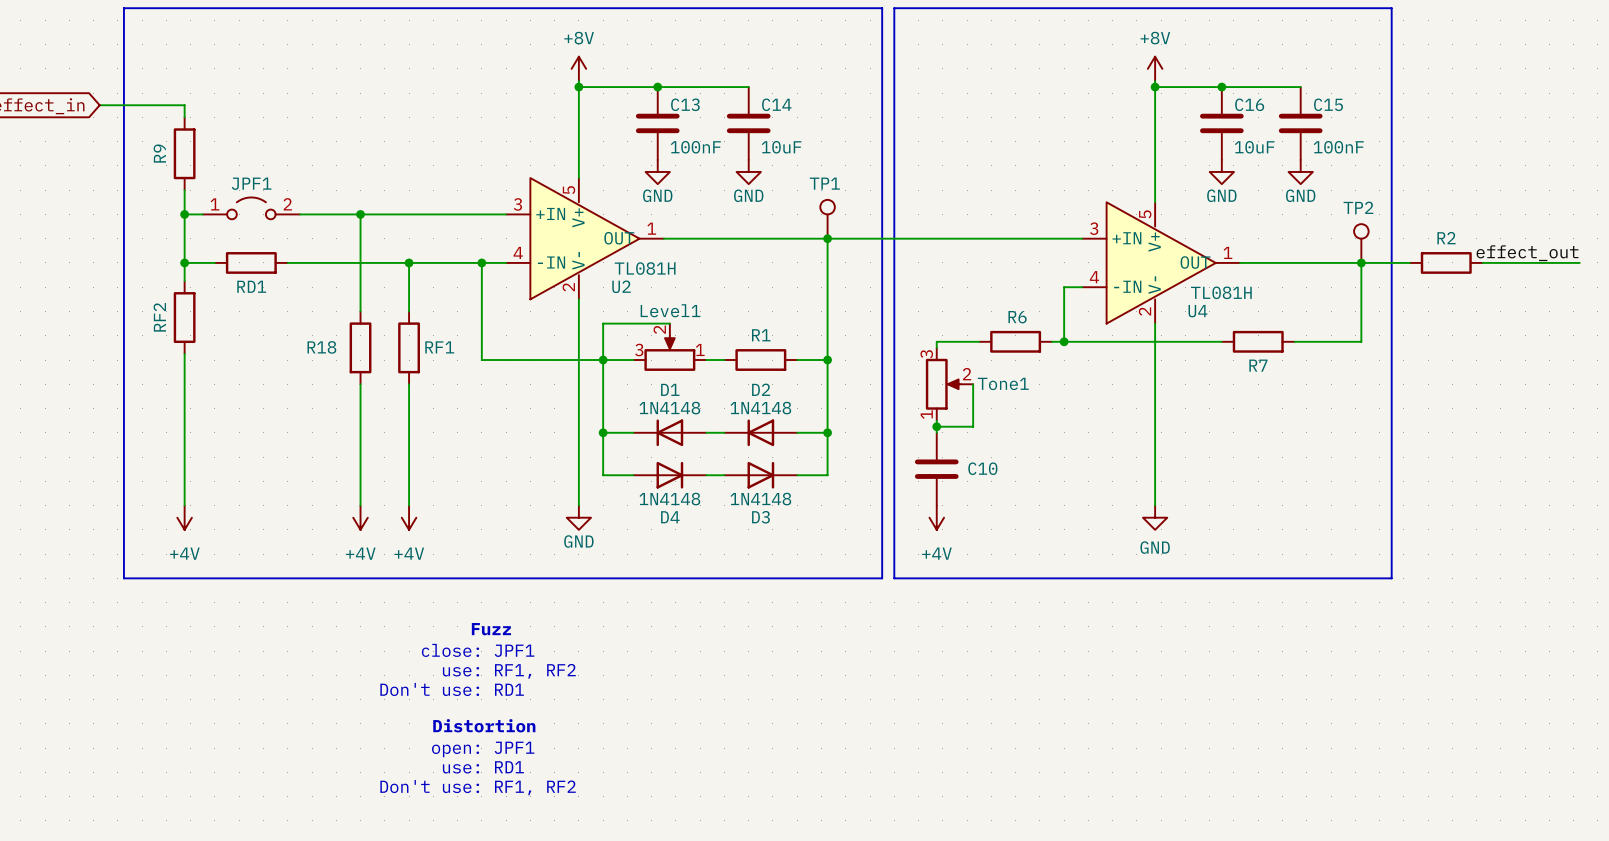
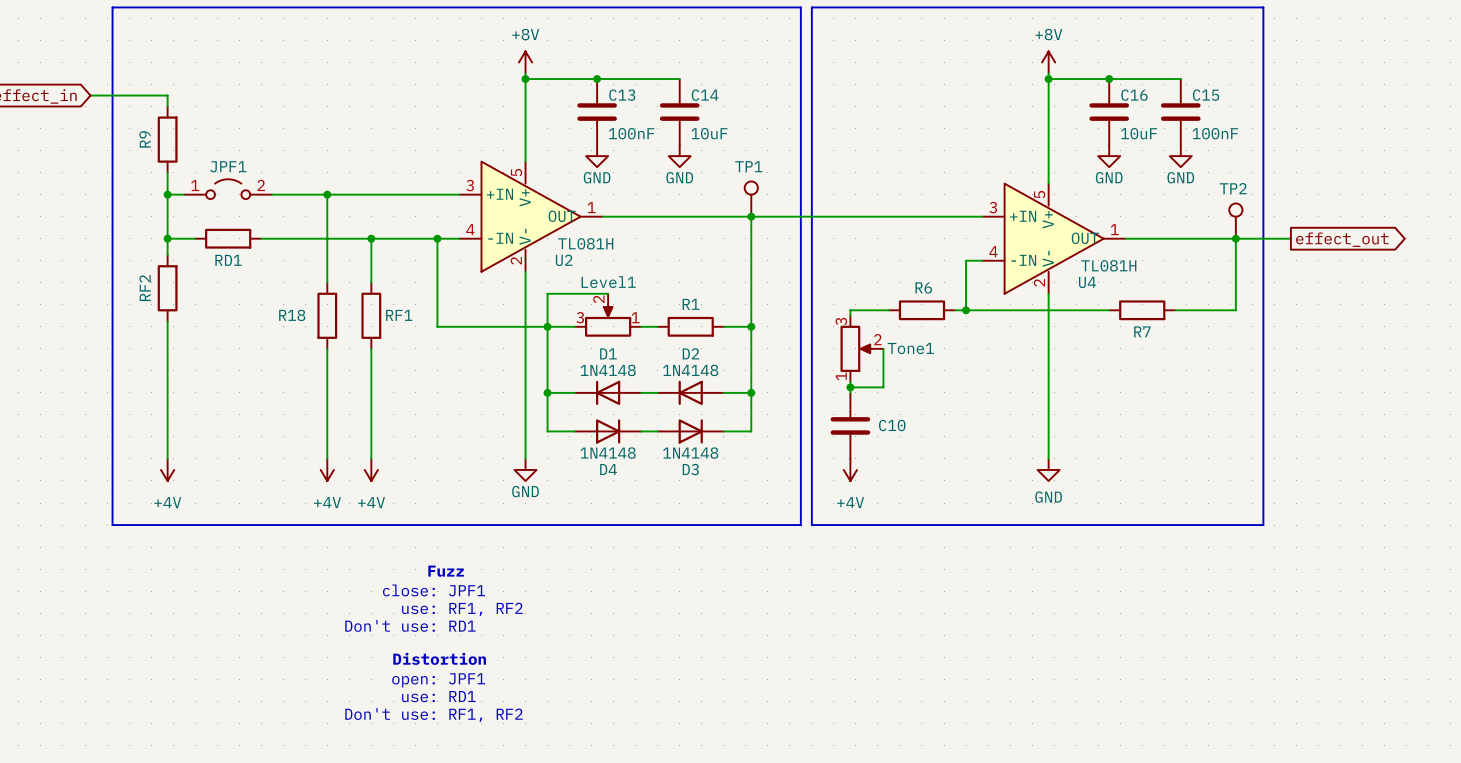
label: effect_out (1527, 253) -> none
R2: (1446, 262) -> none
wire: (1482, 262) (1579, 262) -> none
global label: none -> effect_out (1342, 239)

